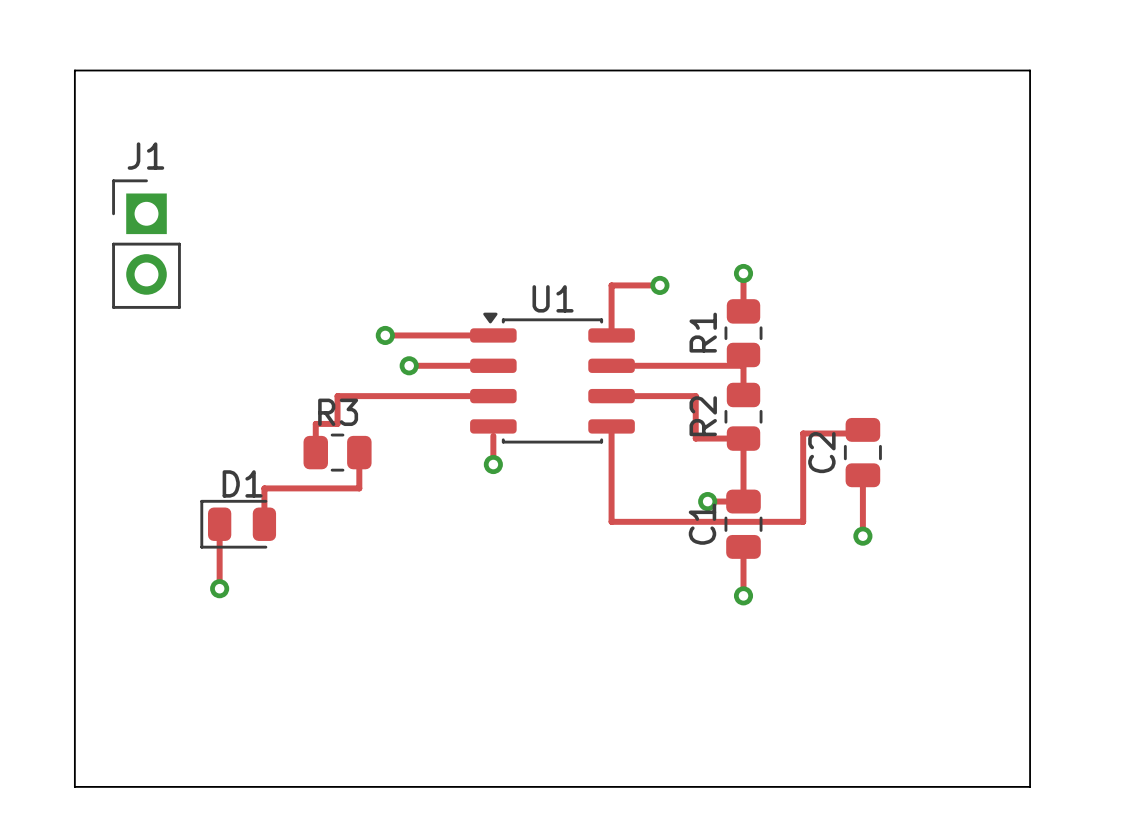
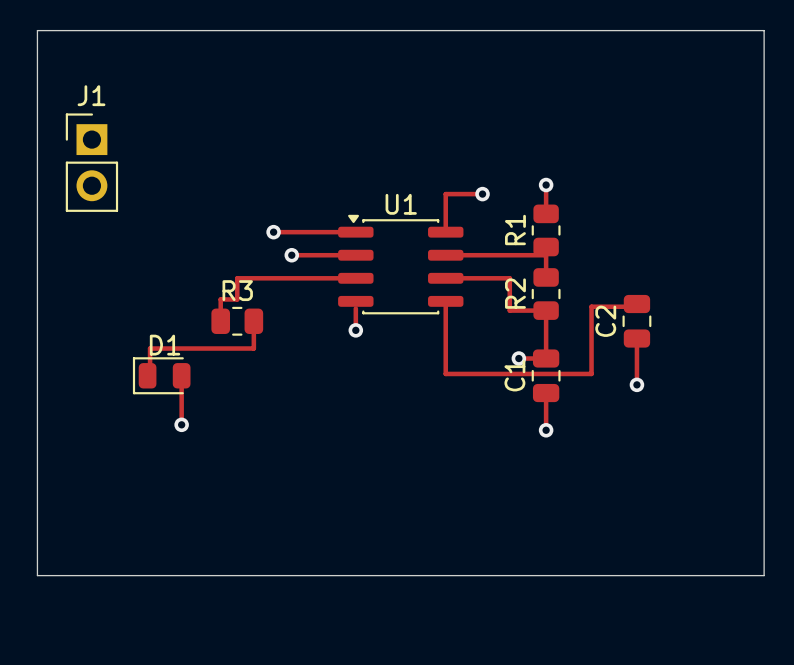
track: (264, 488) (264, 521) -> (181, 348) (150, 348) (150, 373)
track: (219, 536) (219, 588) -> (181, 384) (181, 424)
via position: (219, 588) -> (181, 424)

